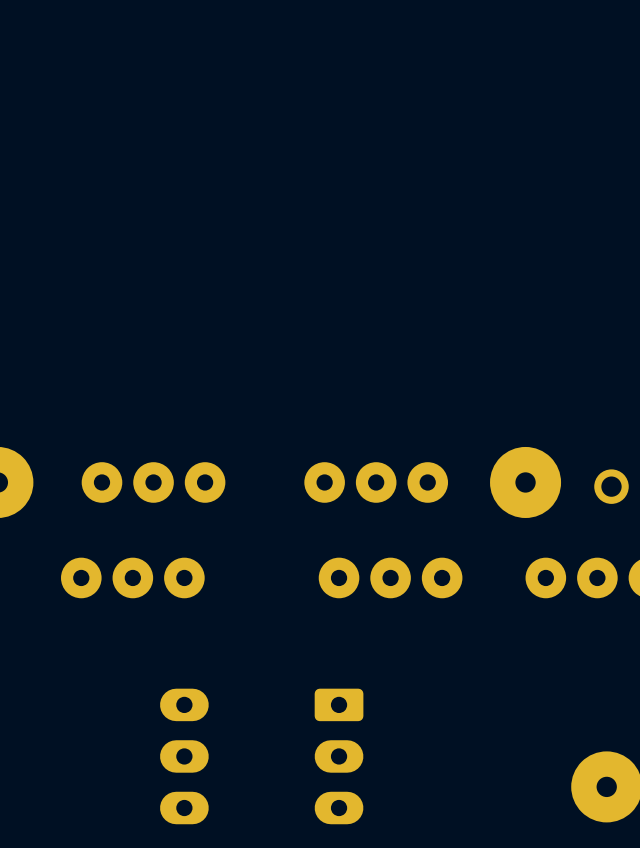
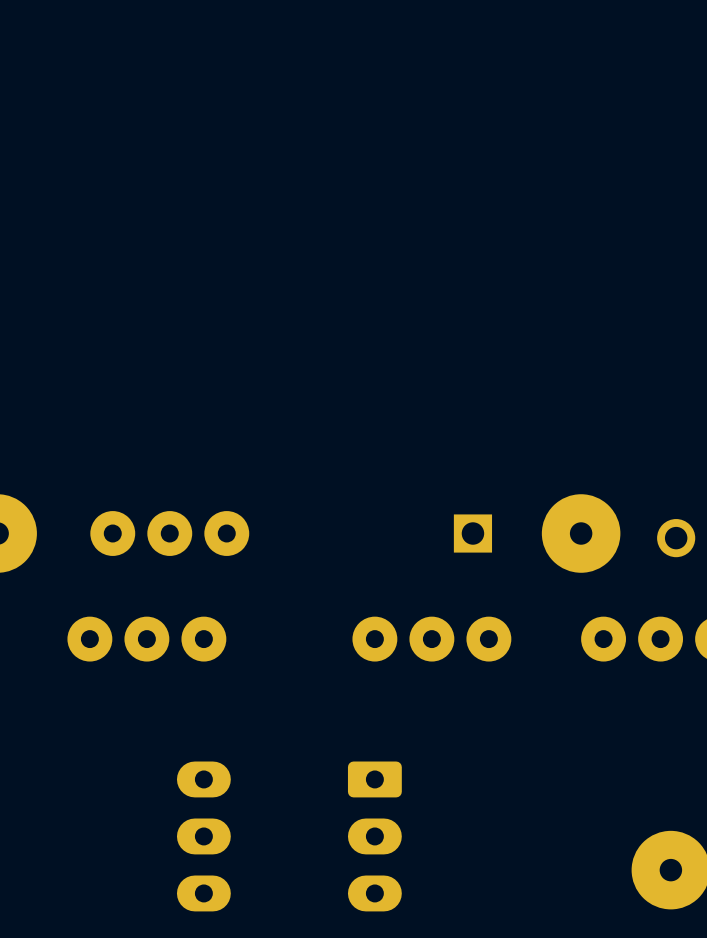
part: (376, 482) -> none
part: none -> (472, 533)

